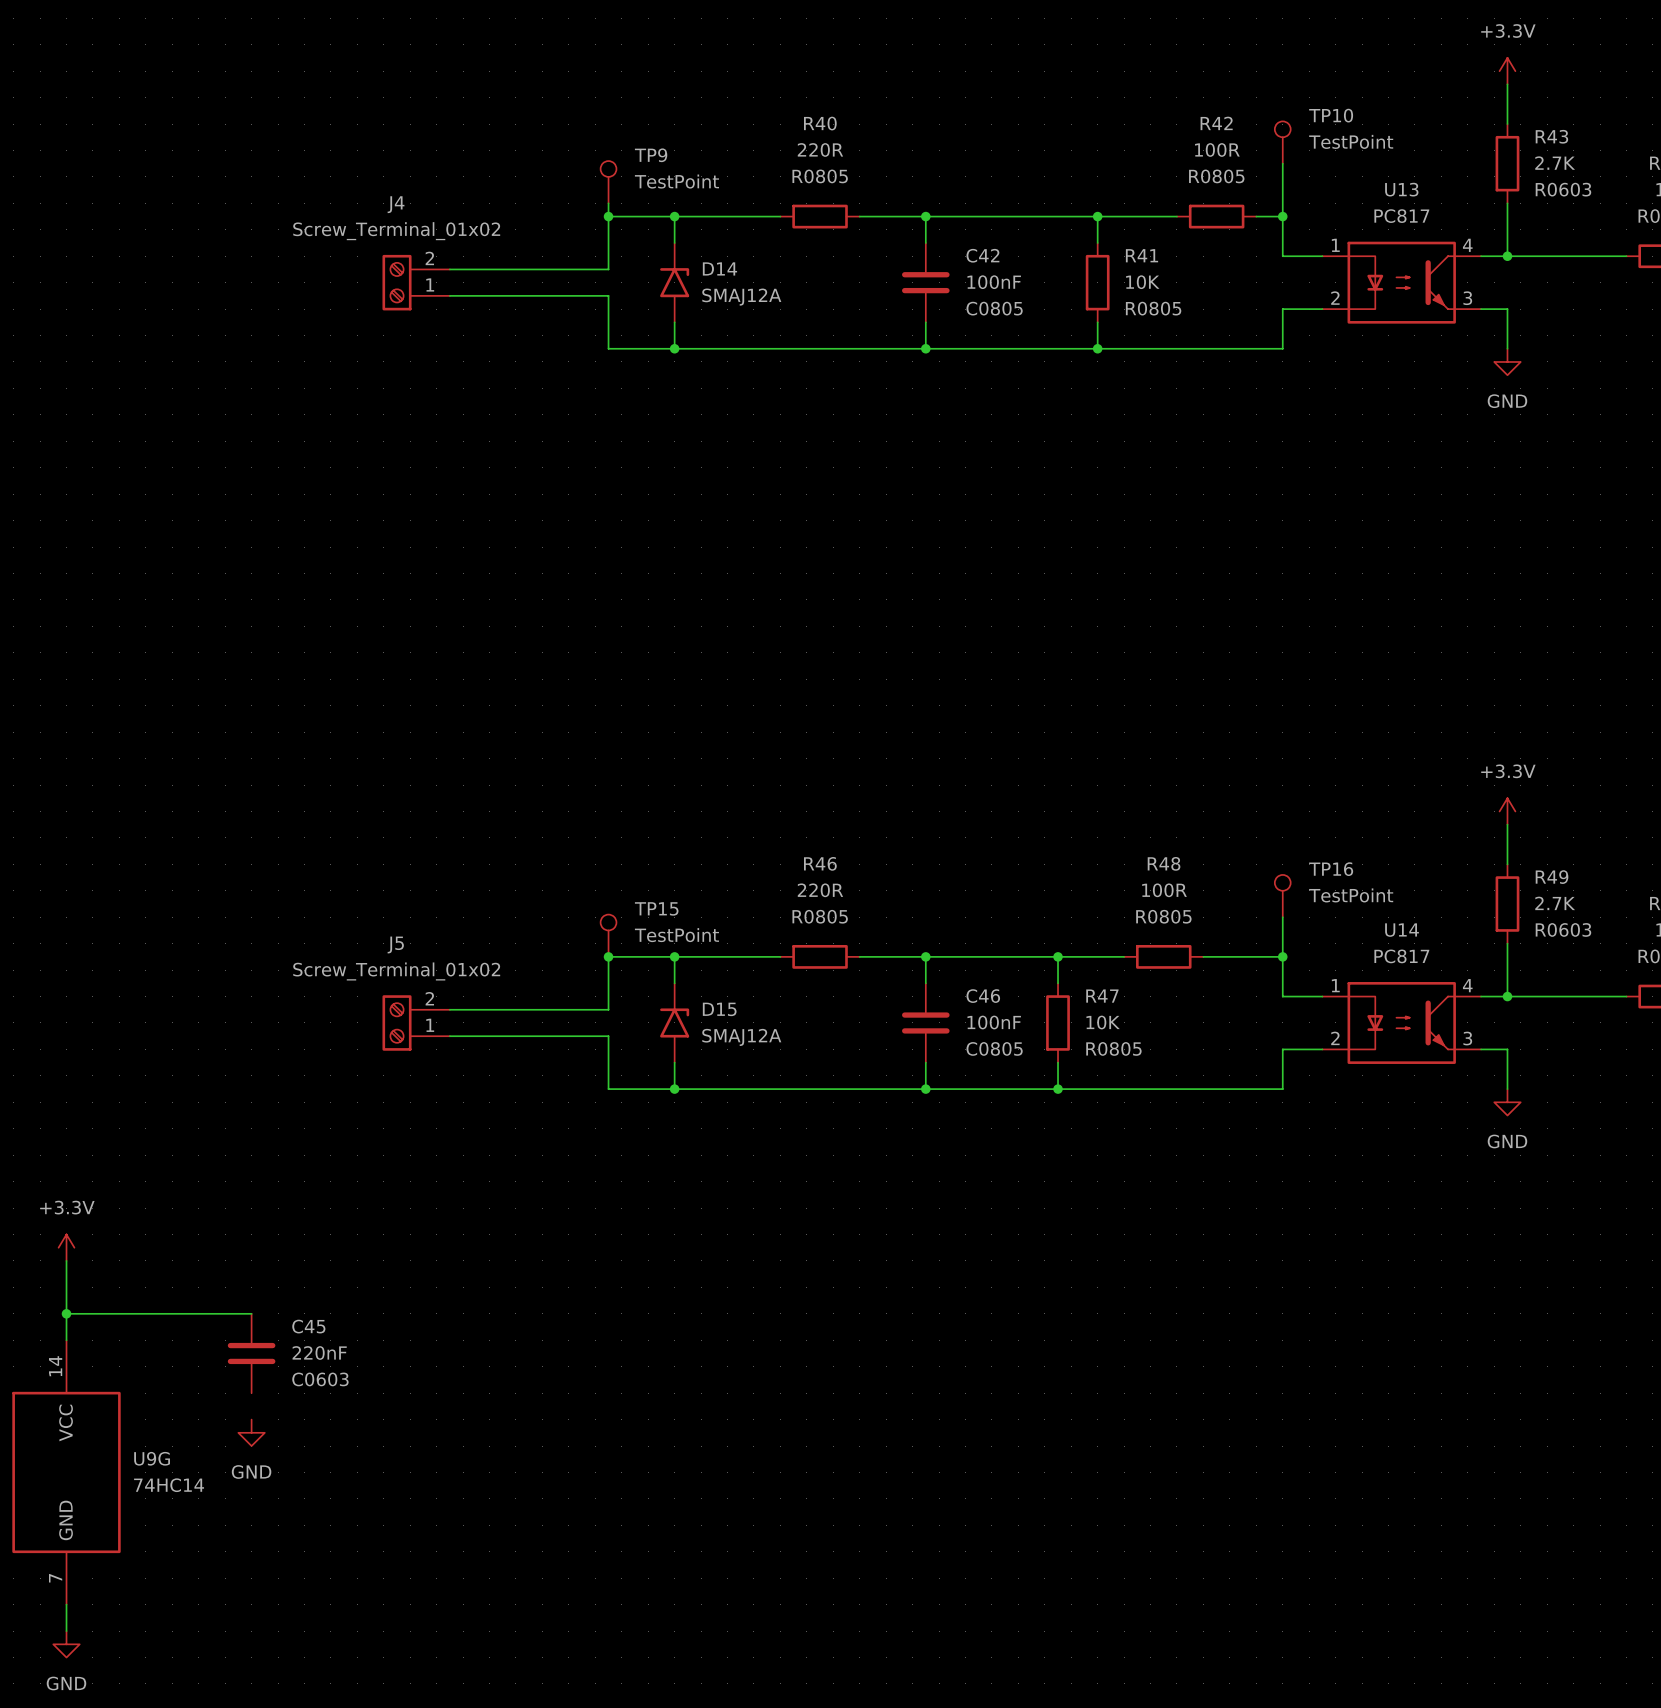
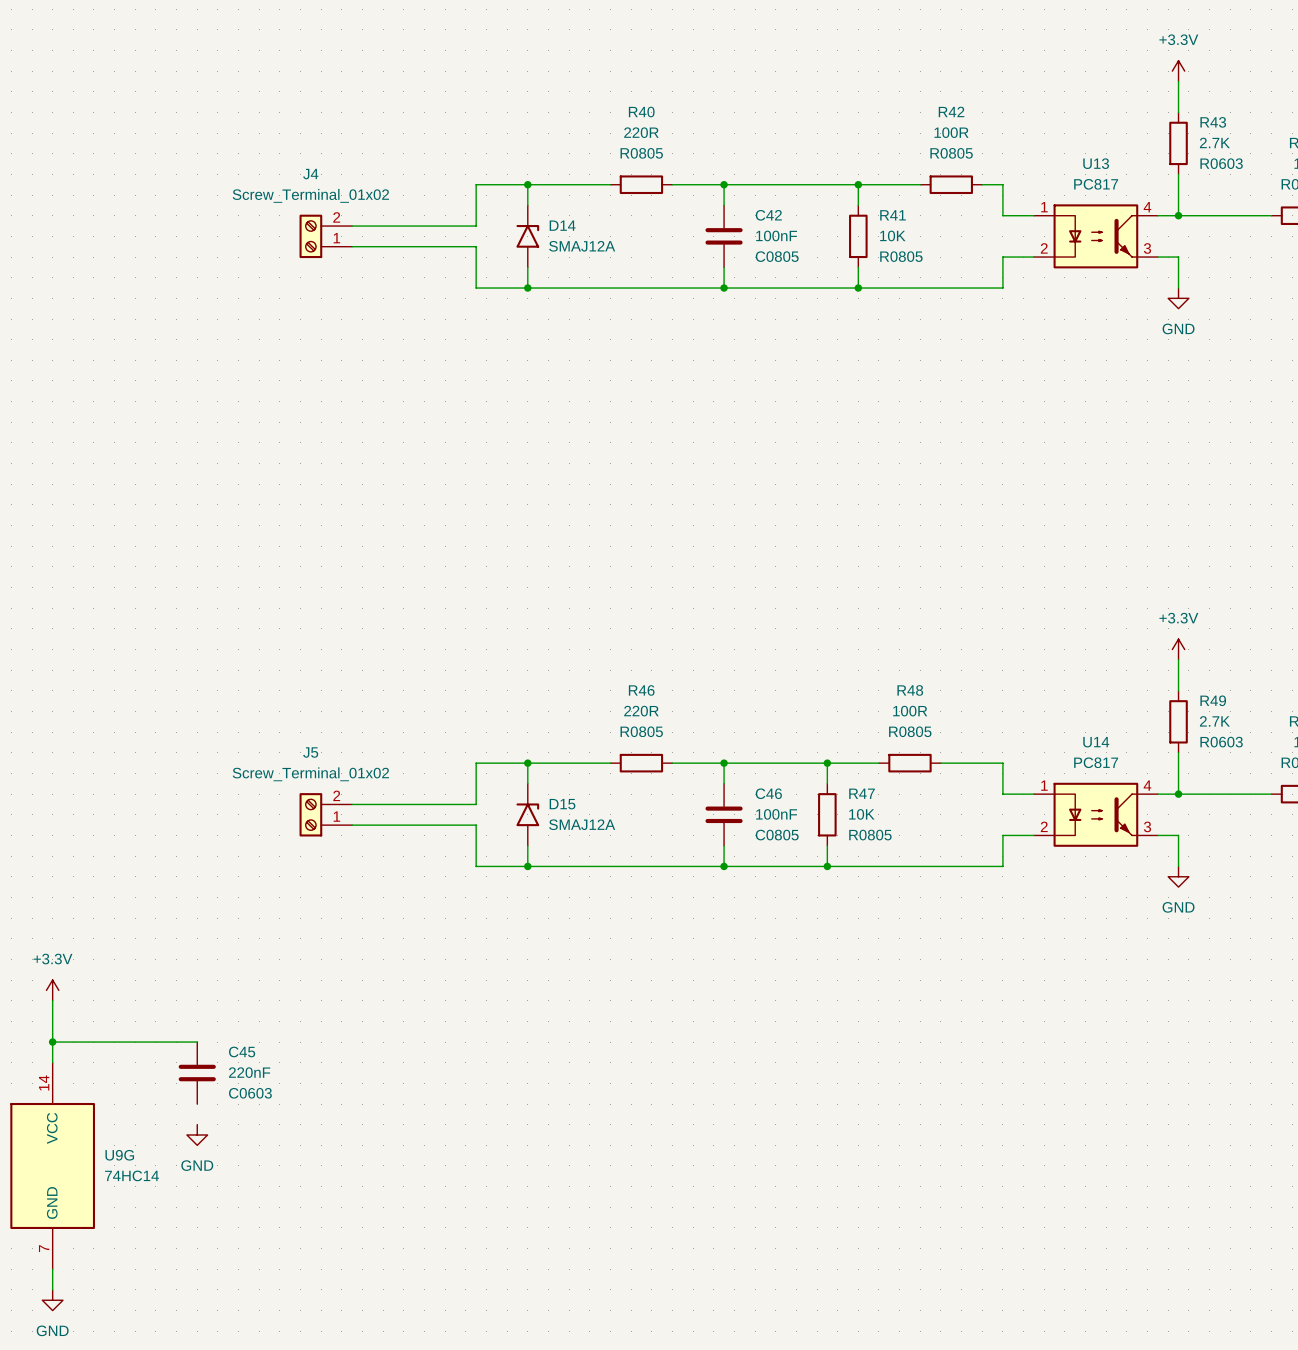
TP10: TestPoint (1282, 142) -> none
wire: (1282, 163) (1282, 216) -> none
TP9: TestPoint (608, 182) -> none
wire: (608, 203) (608, 216) -> none
junction: (608, 216) -> none
junction: (1282, 216) -> none
TP16: TestPoint (1282, 896) -> none
wire: (1282, 917) (1282, 956) -> none
TP15: TestPoint (608, 935) -> none
junction: (608, 956) -> none
junction: (1282, 956) -> none

